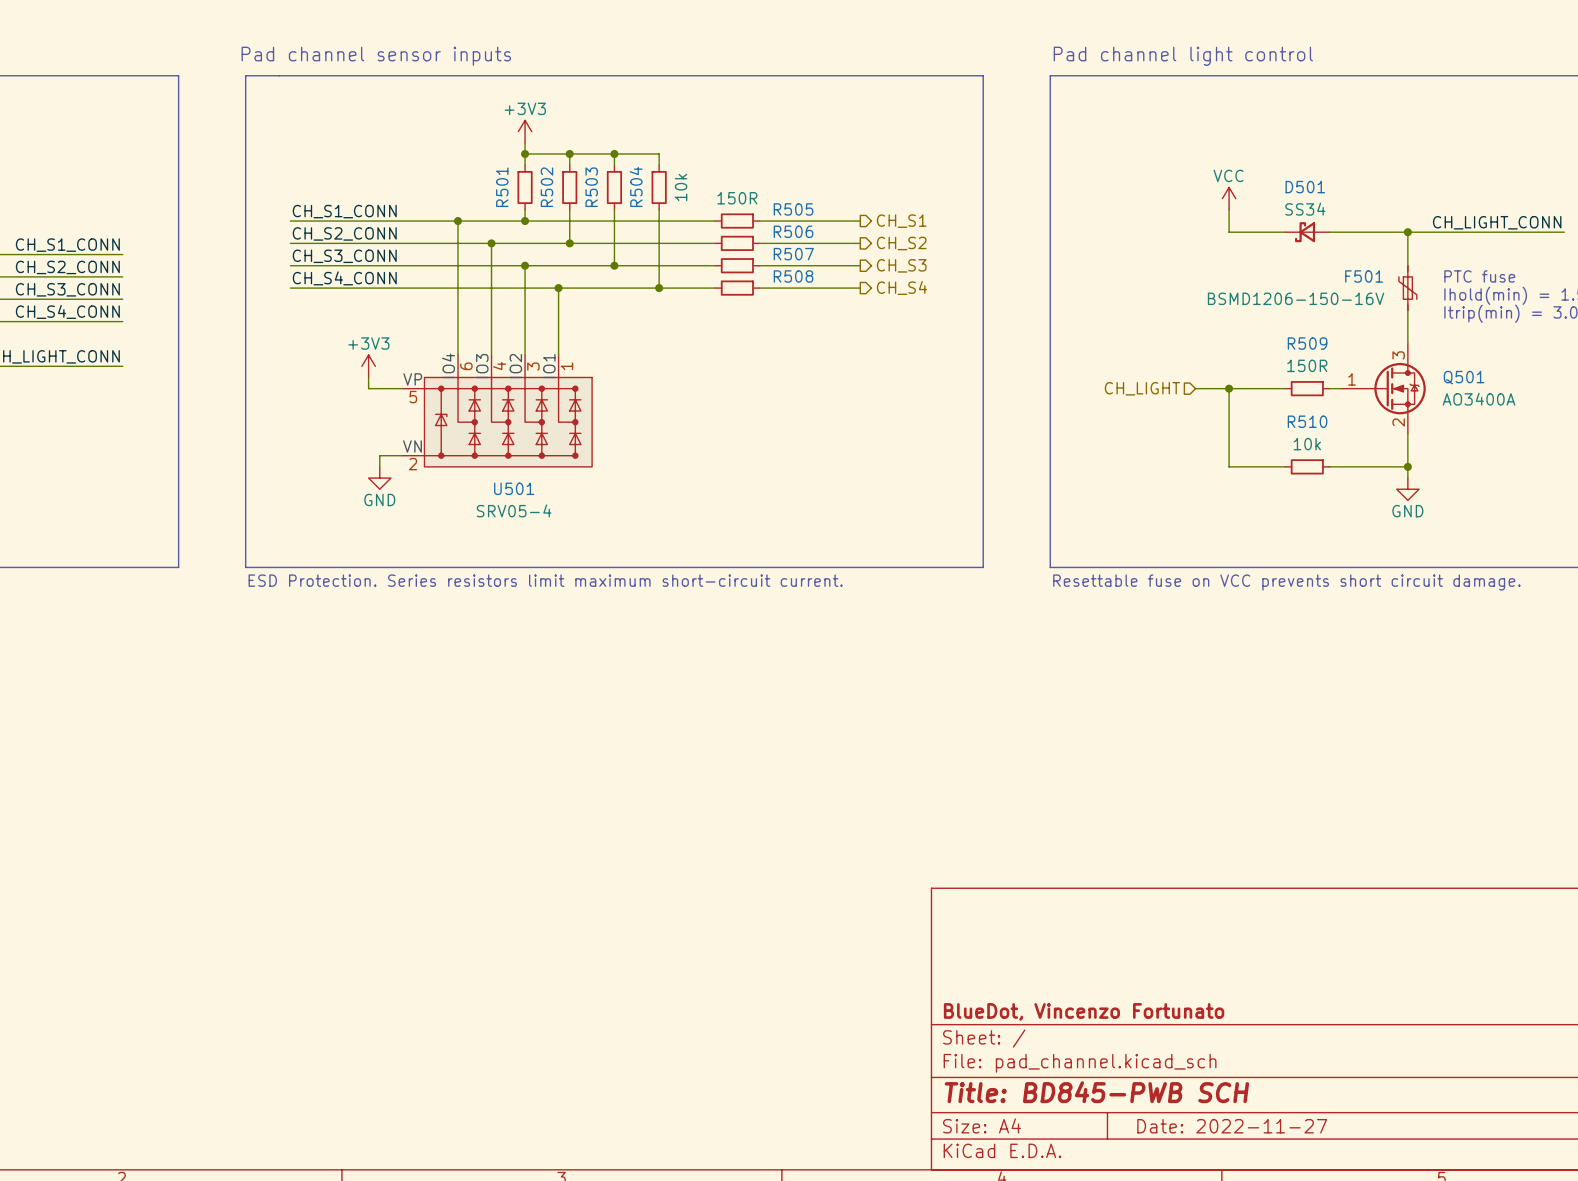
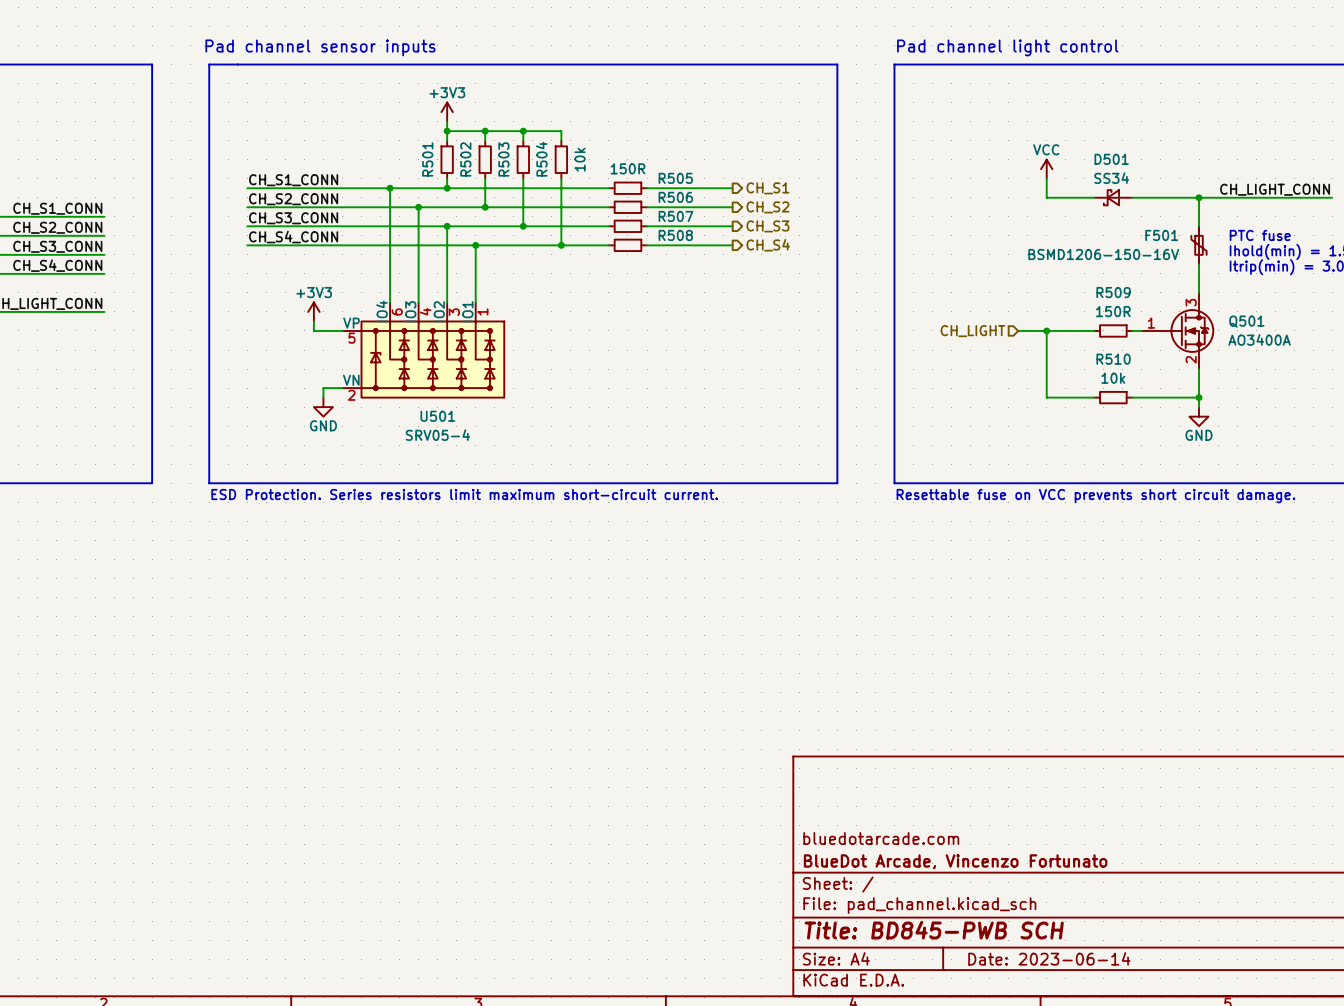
title block: none -> bluedotarcade.com (881, 838)
title block: BlueDot, Vincenzo Fortunato (1084, 1011) -> BlueDot Arcade, Vincenzo Fortunato (955, 861)
title block: Date: 2022-11-27 (1232, 1126) -> Date: 2023-06-14 (1049, 958)

